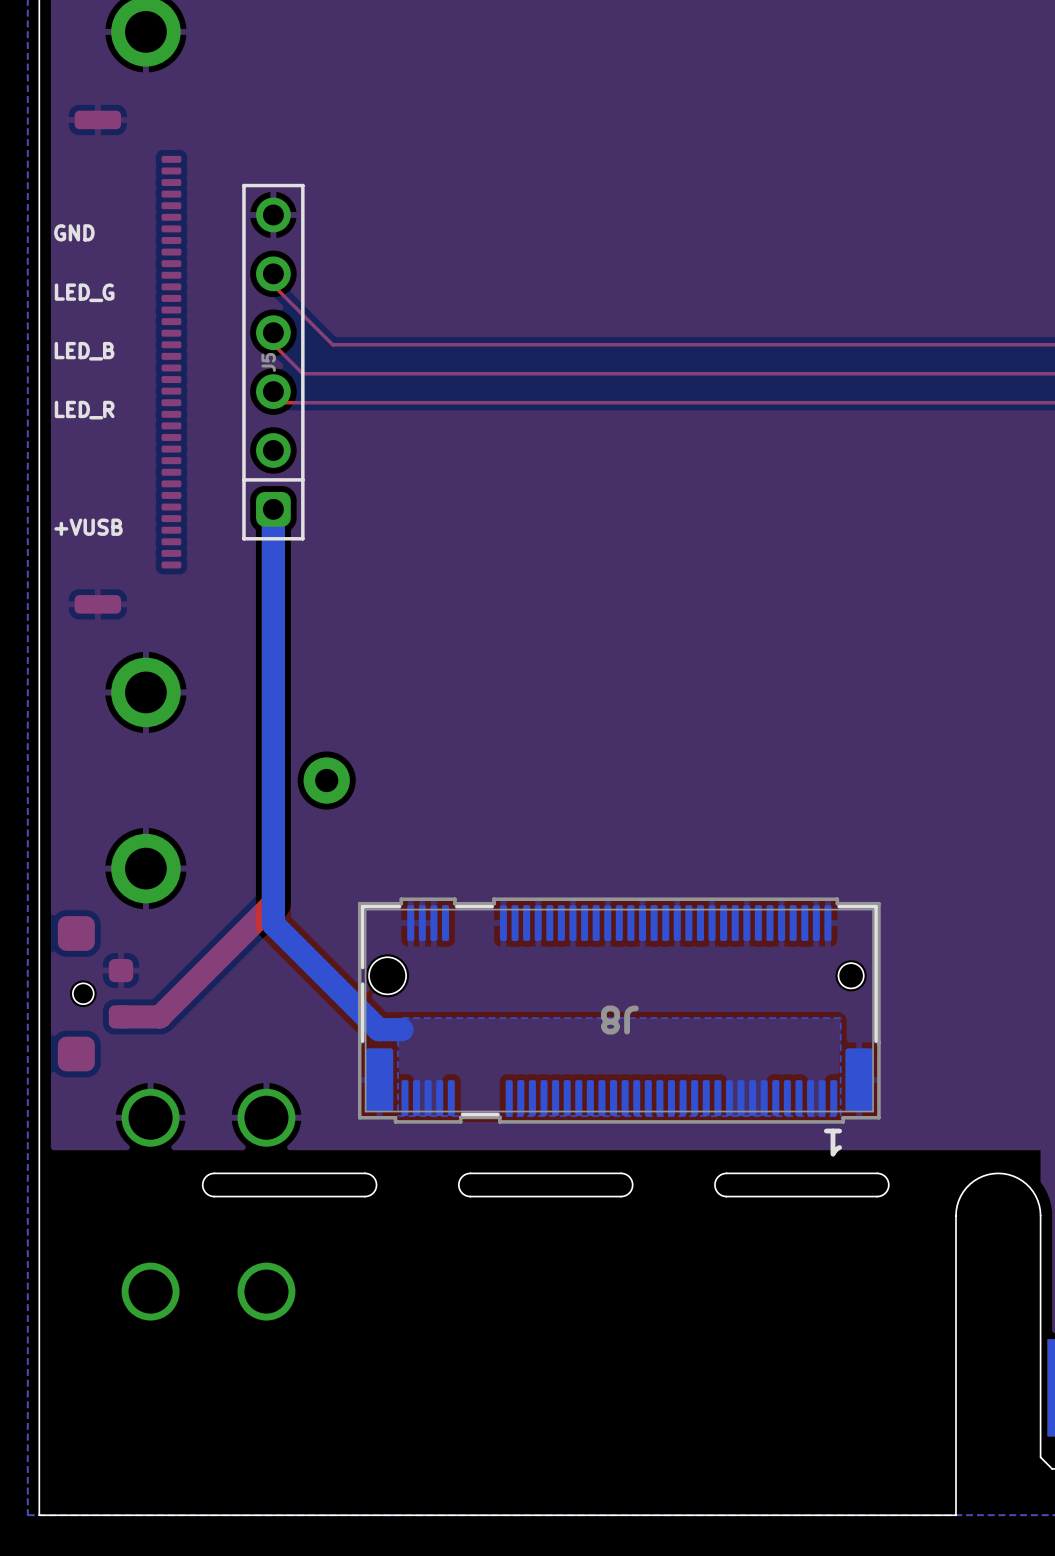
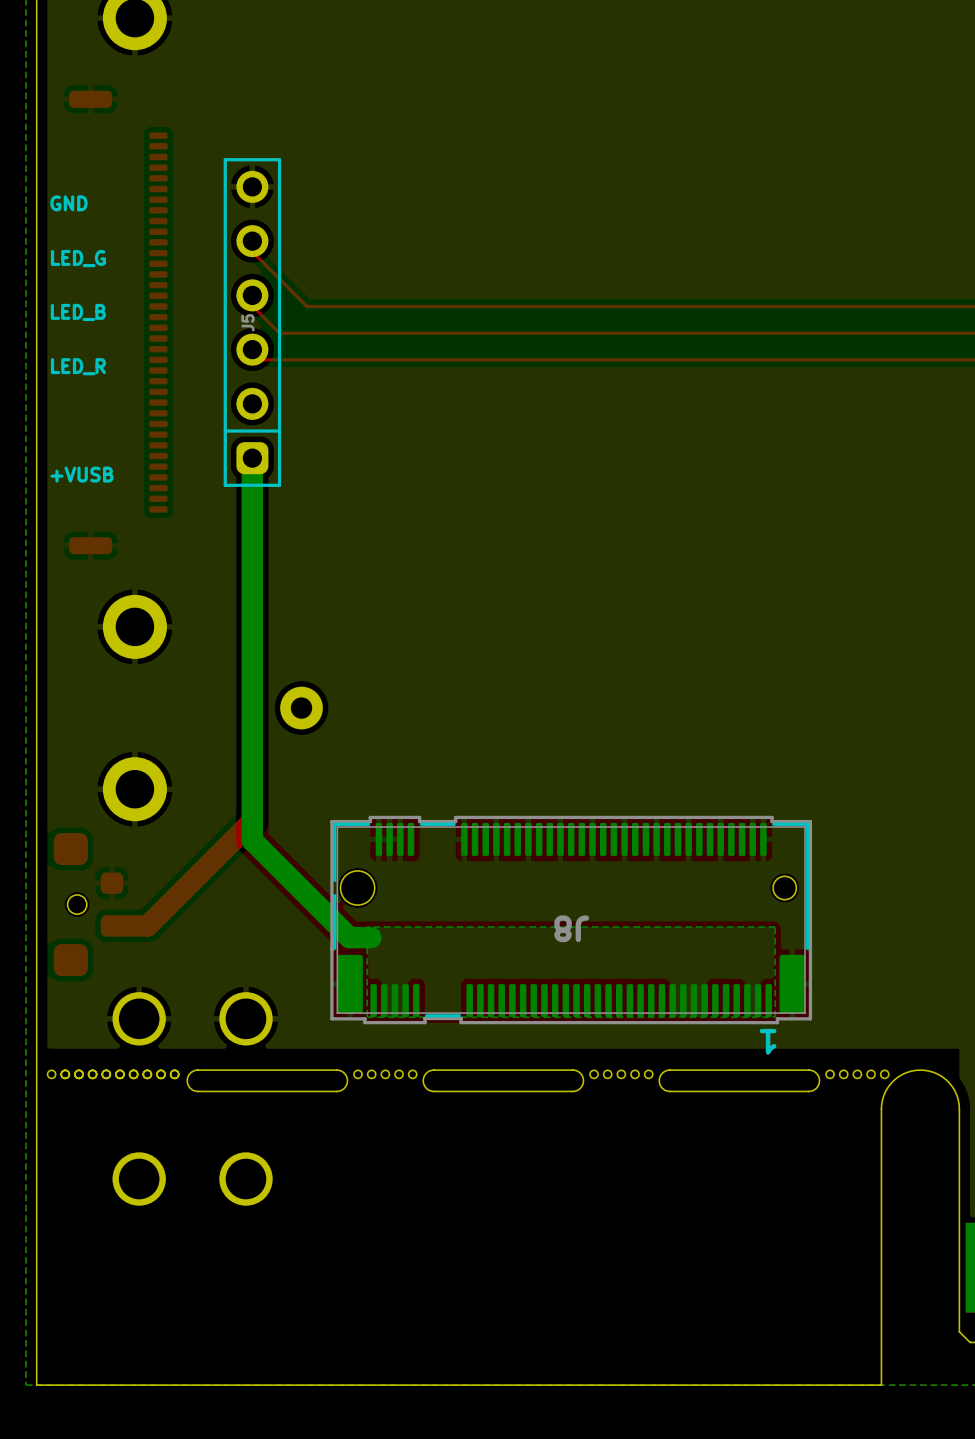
part: none -> (51, 1074)
part: none -> (65, 1074)
part: none -> (78, 1074)
part: none -> (92, 1074)
part: none -> (106, 1074)
part: none -> (119, 1074)
part: none -> (133, 1074)
part: none -> (147, 1074)
part: none -> (160, 1074)
part: none -> (174, 1074)
part: none -> (358, 1074)
part: none -> (371, 1074)
part: none -> (385, 1074)
part: none -> (399, 1074)
part: none -> (412, 1074)
part: none -> (594, 1074)
part: none -> (607, 1074)
part: none -> (621, 1074)
part: none -> (635, 1074)
part: none -> (648, 1074)
part: none -> (830, 1074)
part: none -> (843, 1074)
part: none -> (857, 1074)
part: none -> (871, 1074)
part: none -> (884, 1074)

